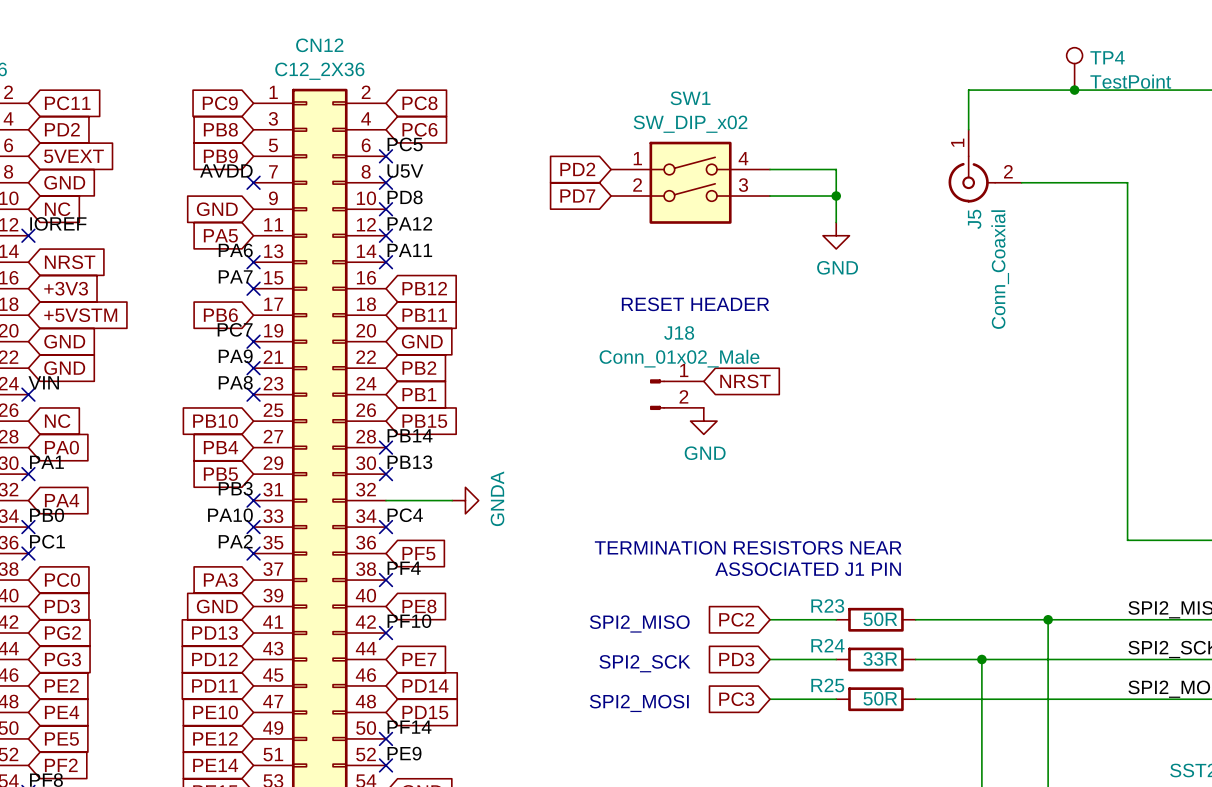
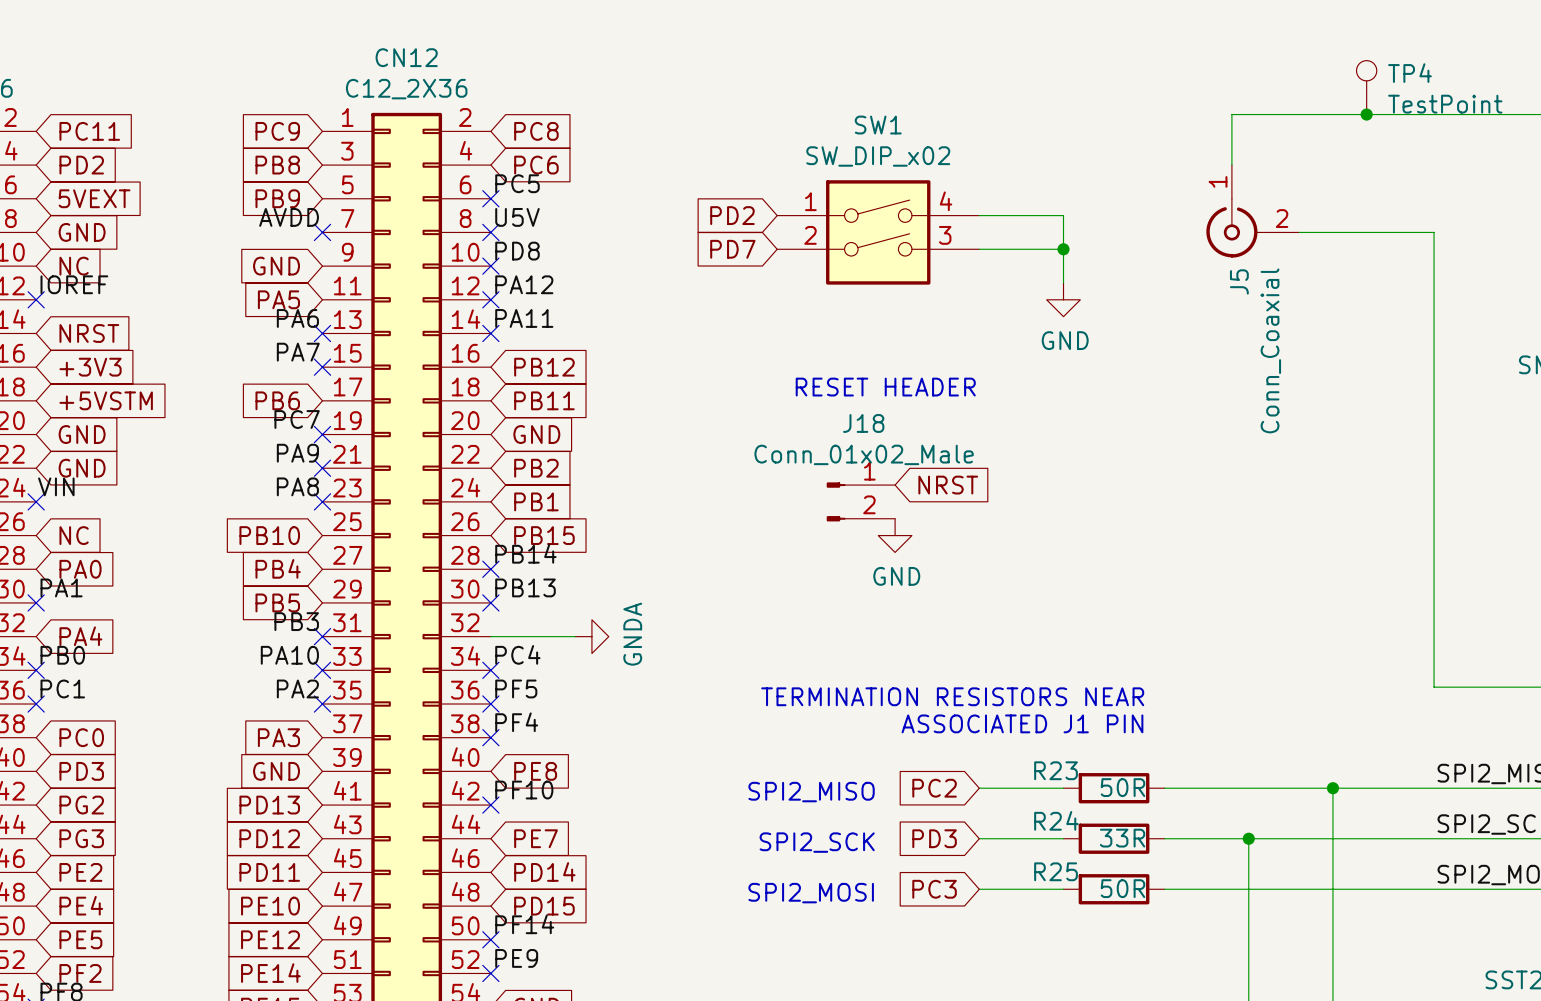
label: none -> PF5 (516, 688)
no-connect mark: none -> (490, 704)
global label: PF5 (418, 553) -> none

